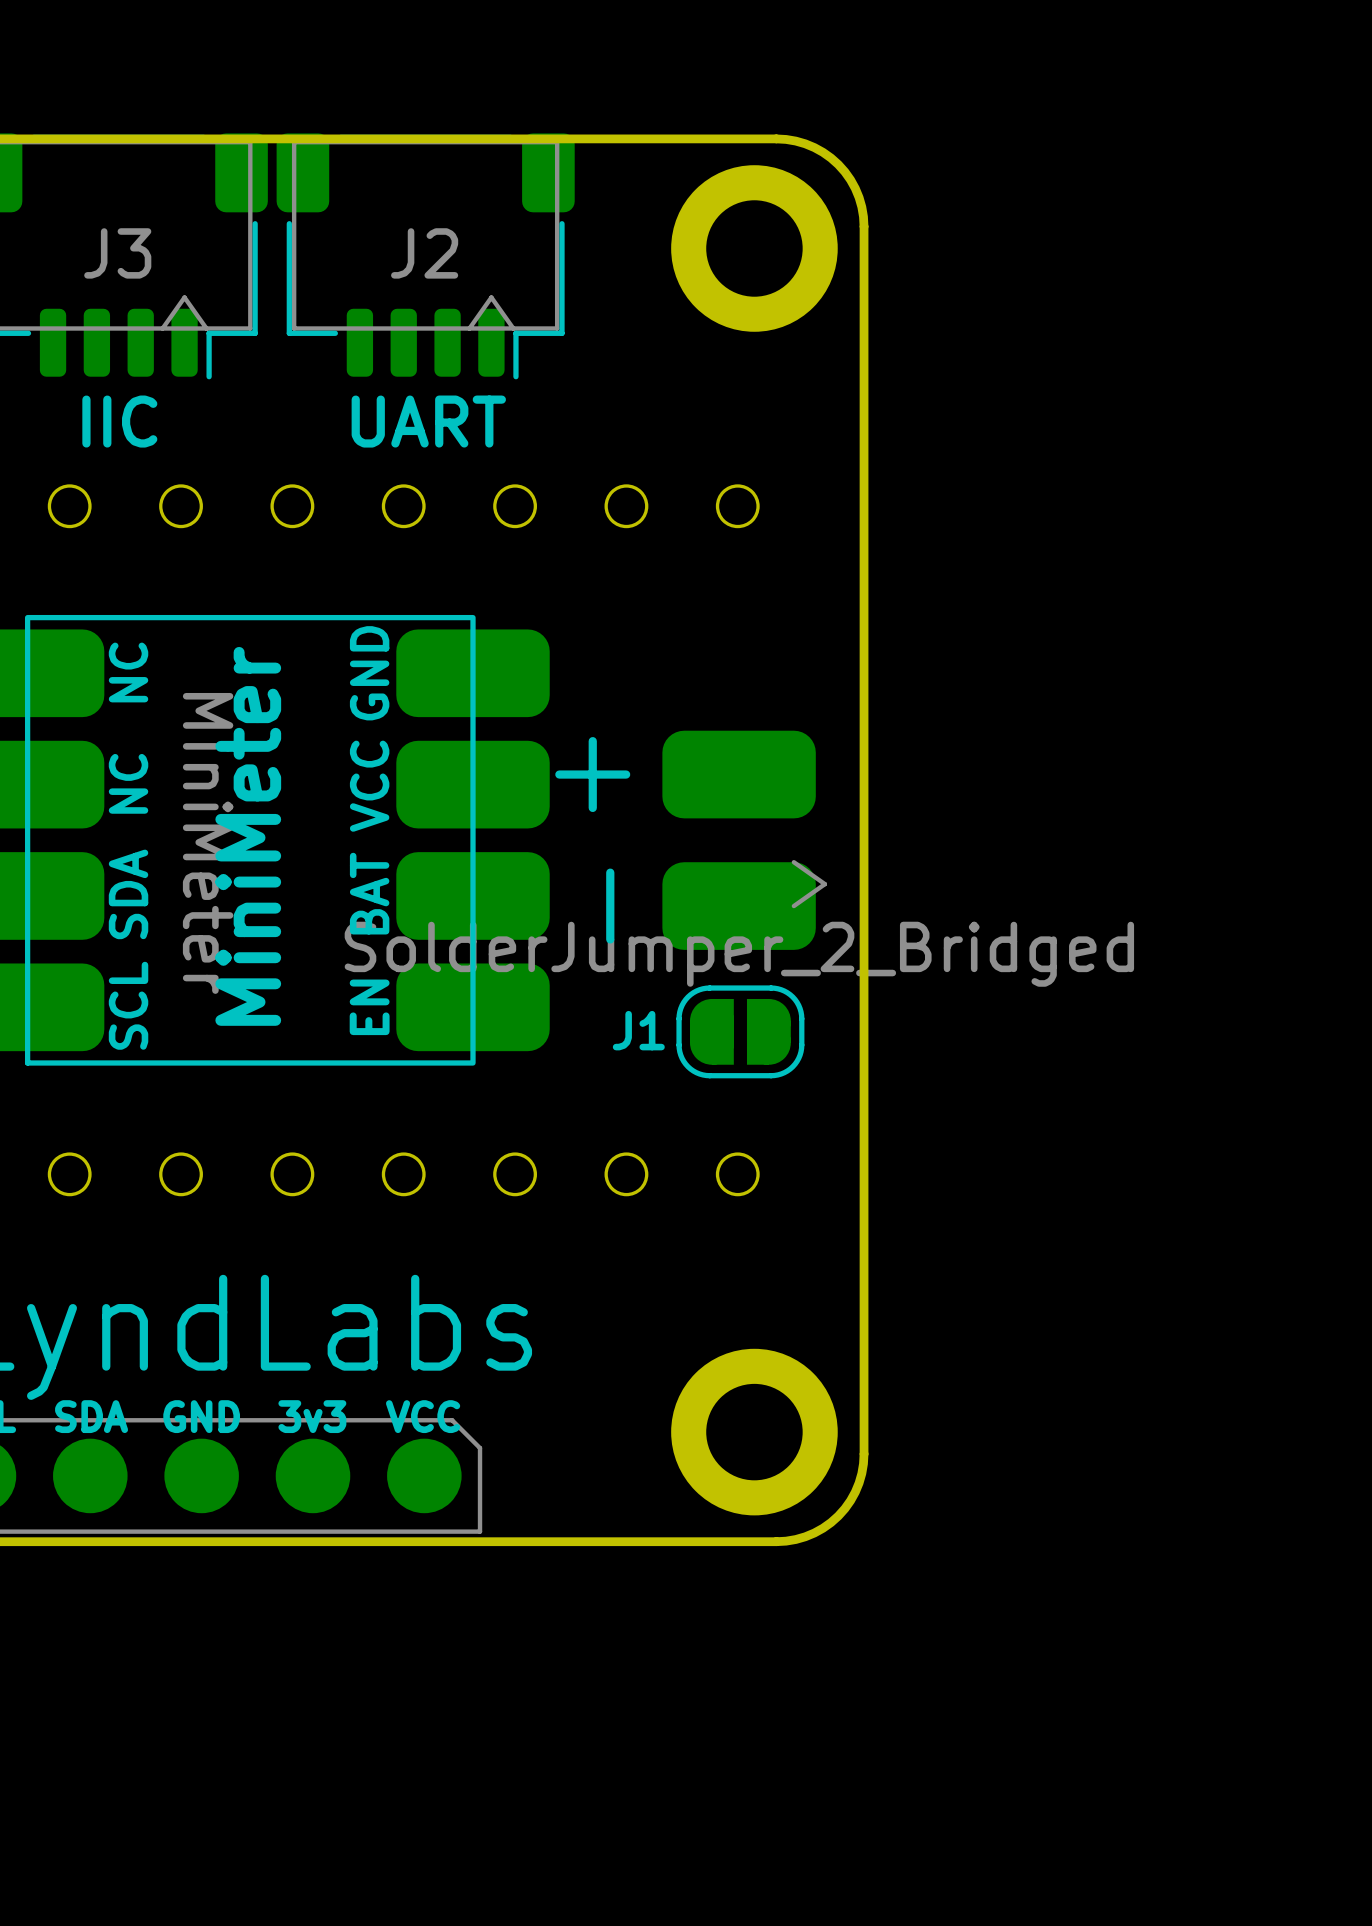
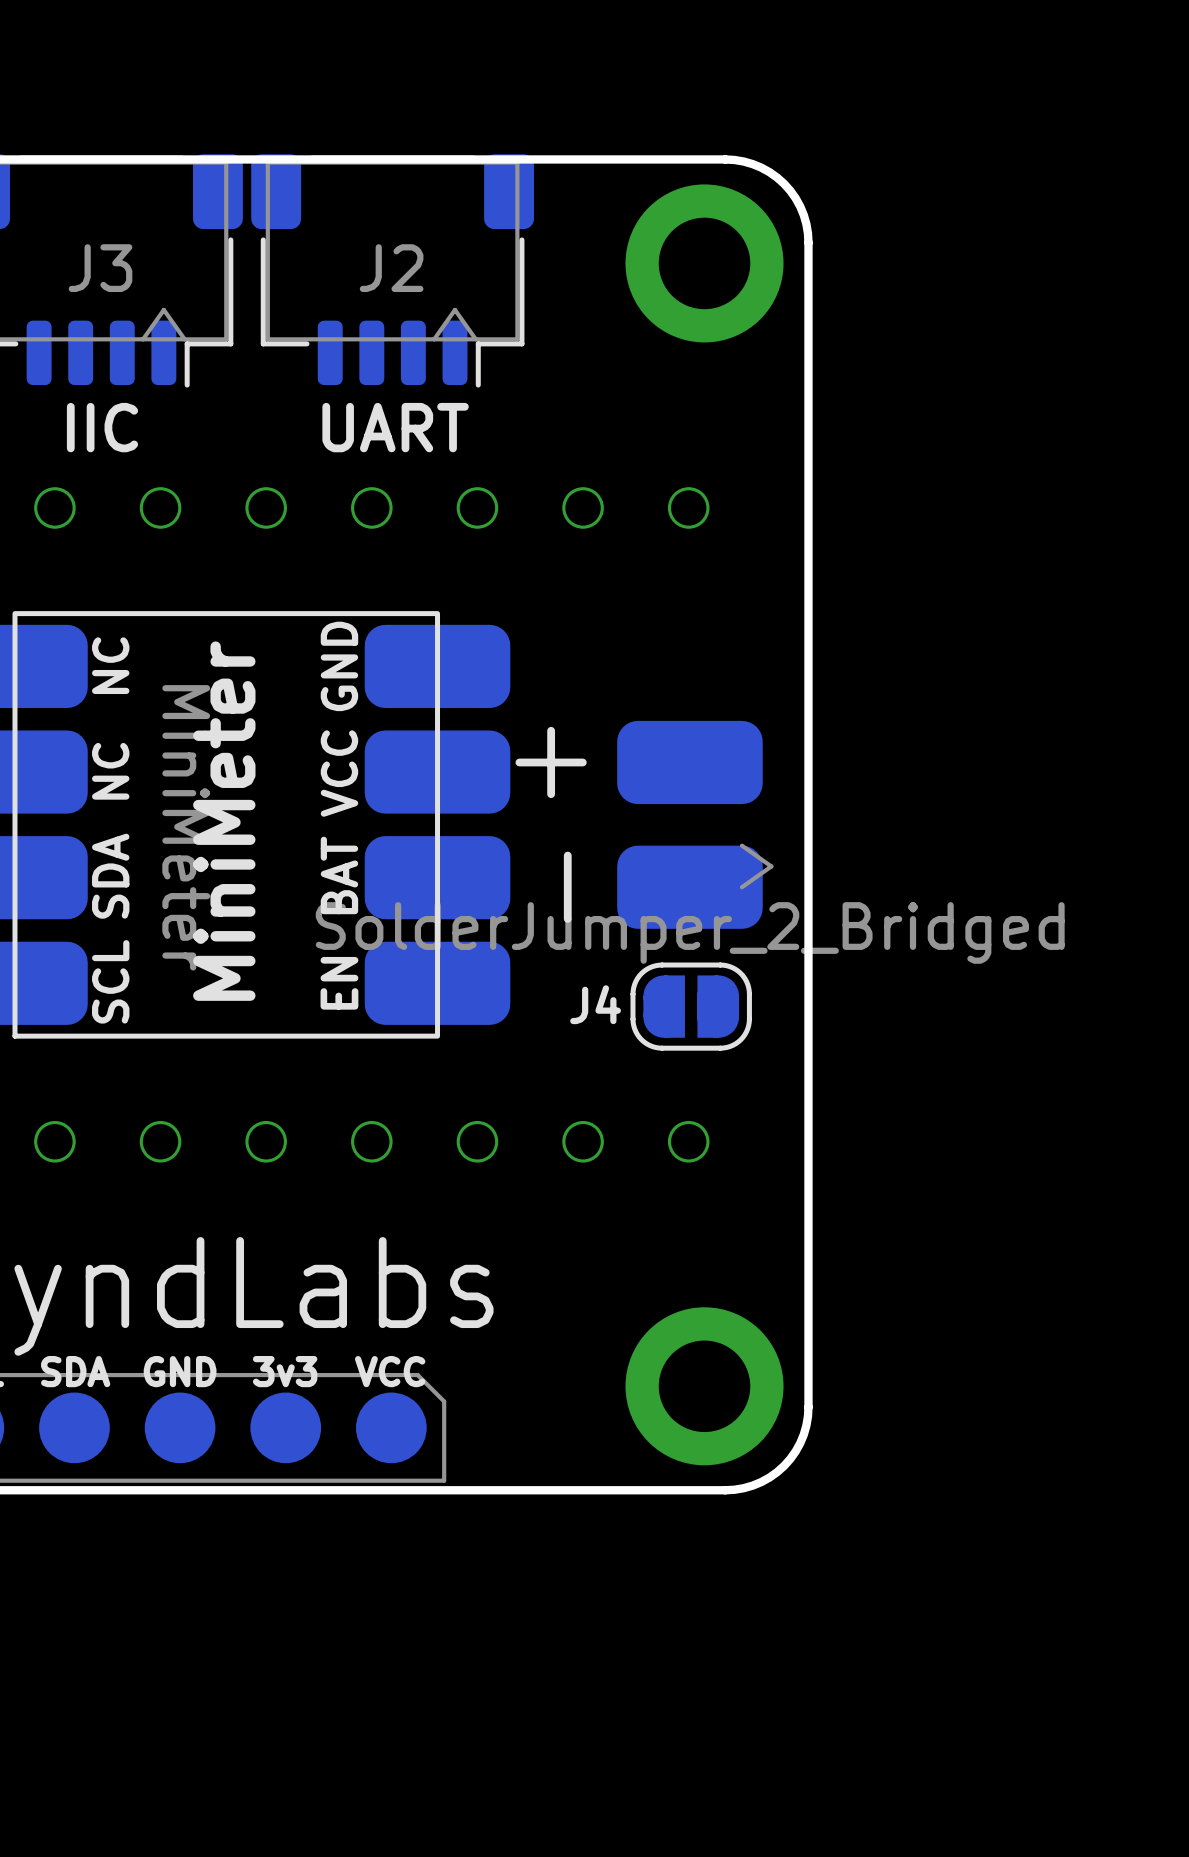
part text: J1 (638, 1030) -> J4 (595, 1004)

